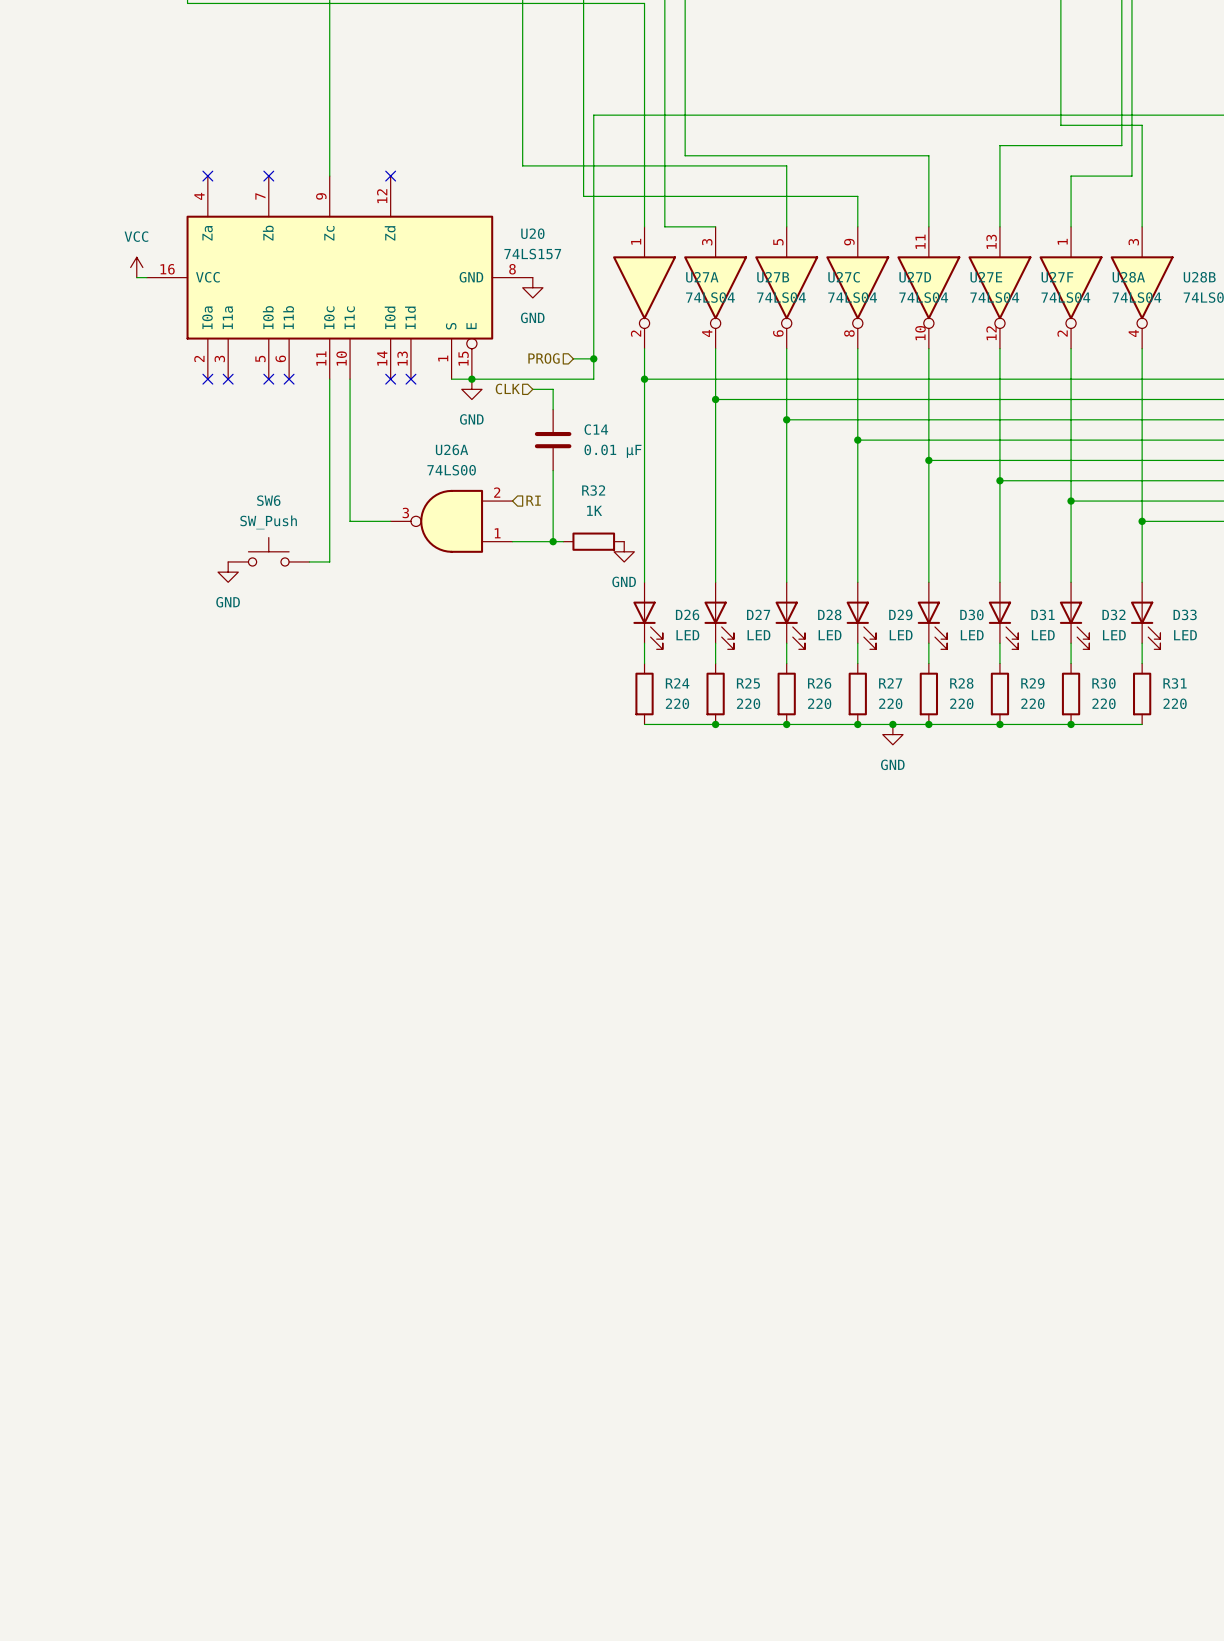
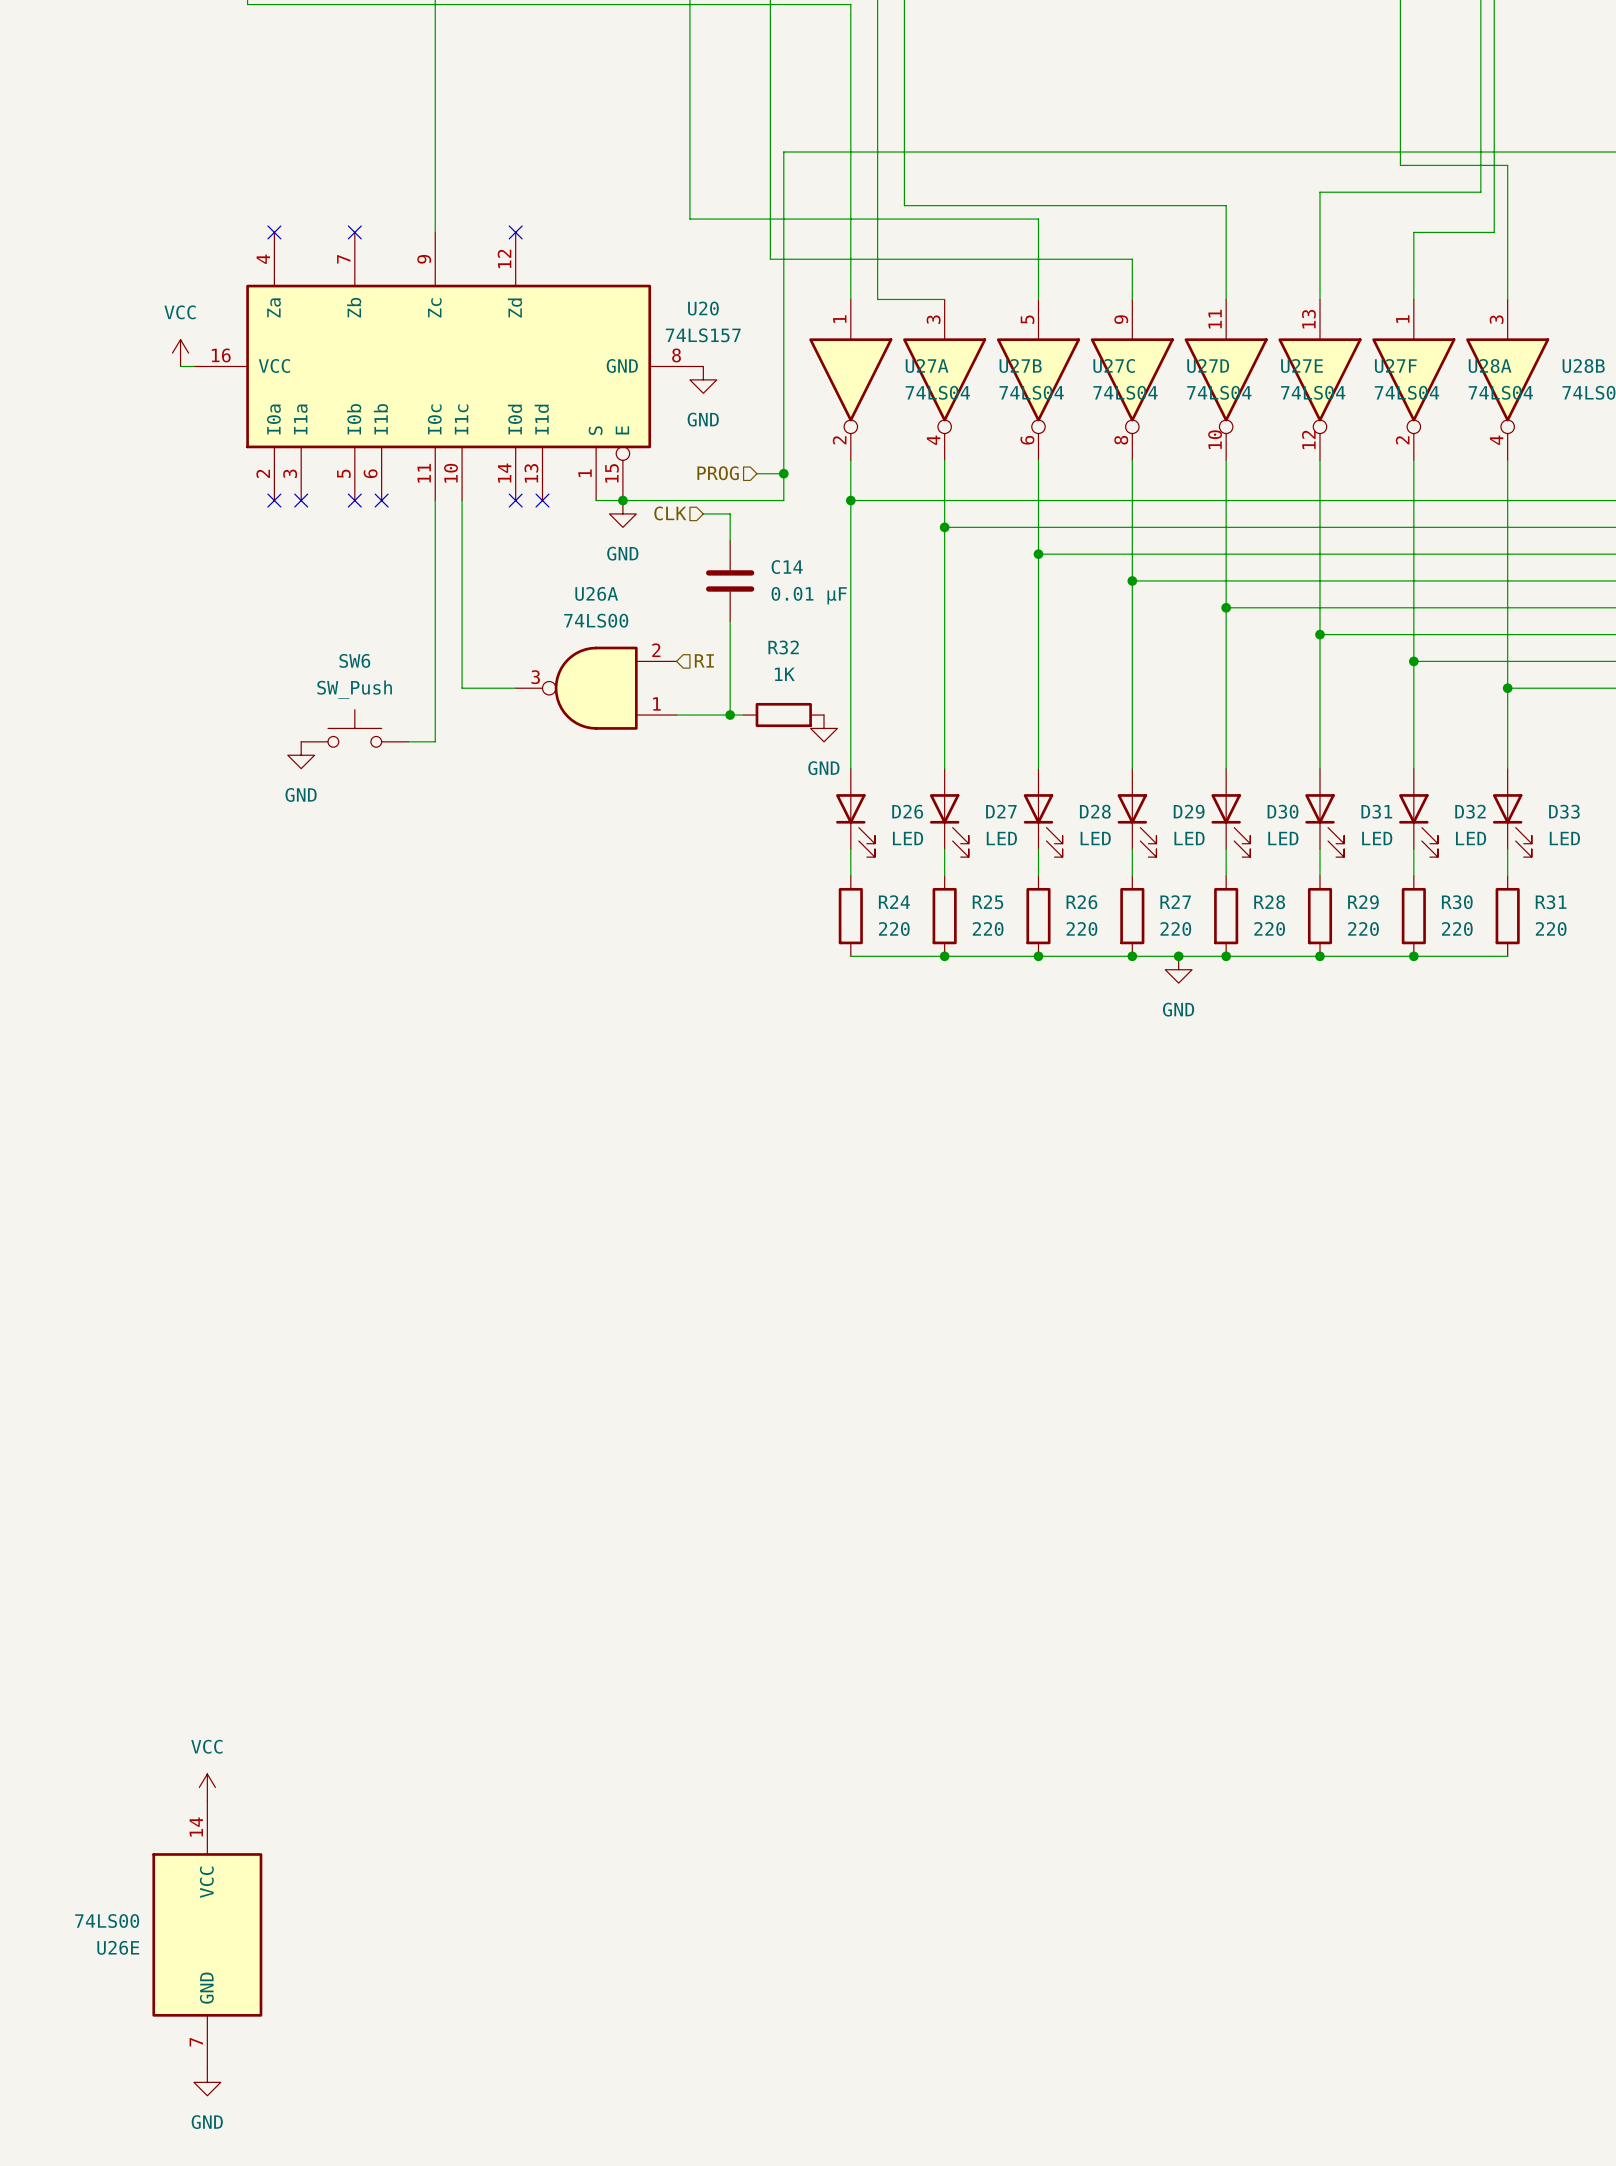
power symbol: none -> VCC (207, 1787)
U26E: none -> 74LS00 (207, 1934)
power symbol: none -> GND (207, 2082)

